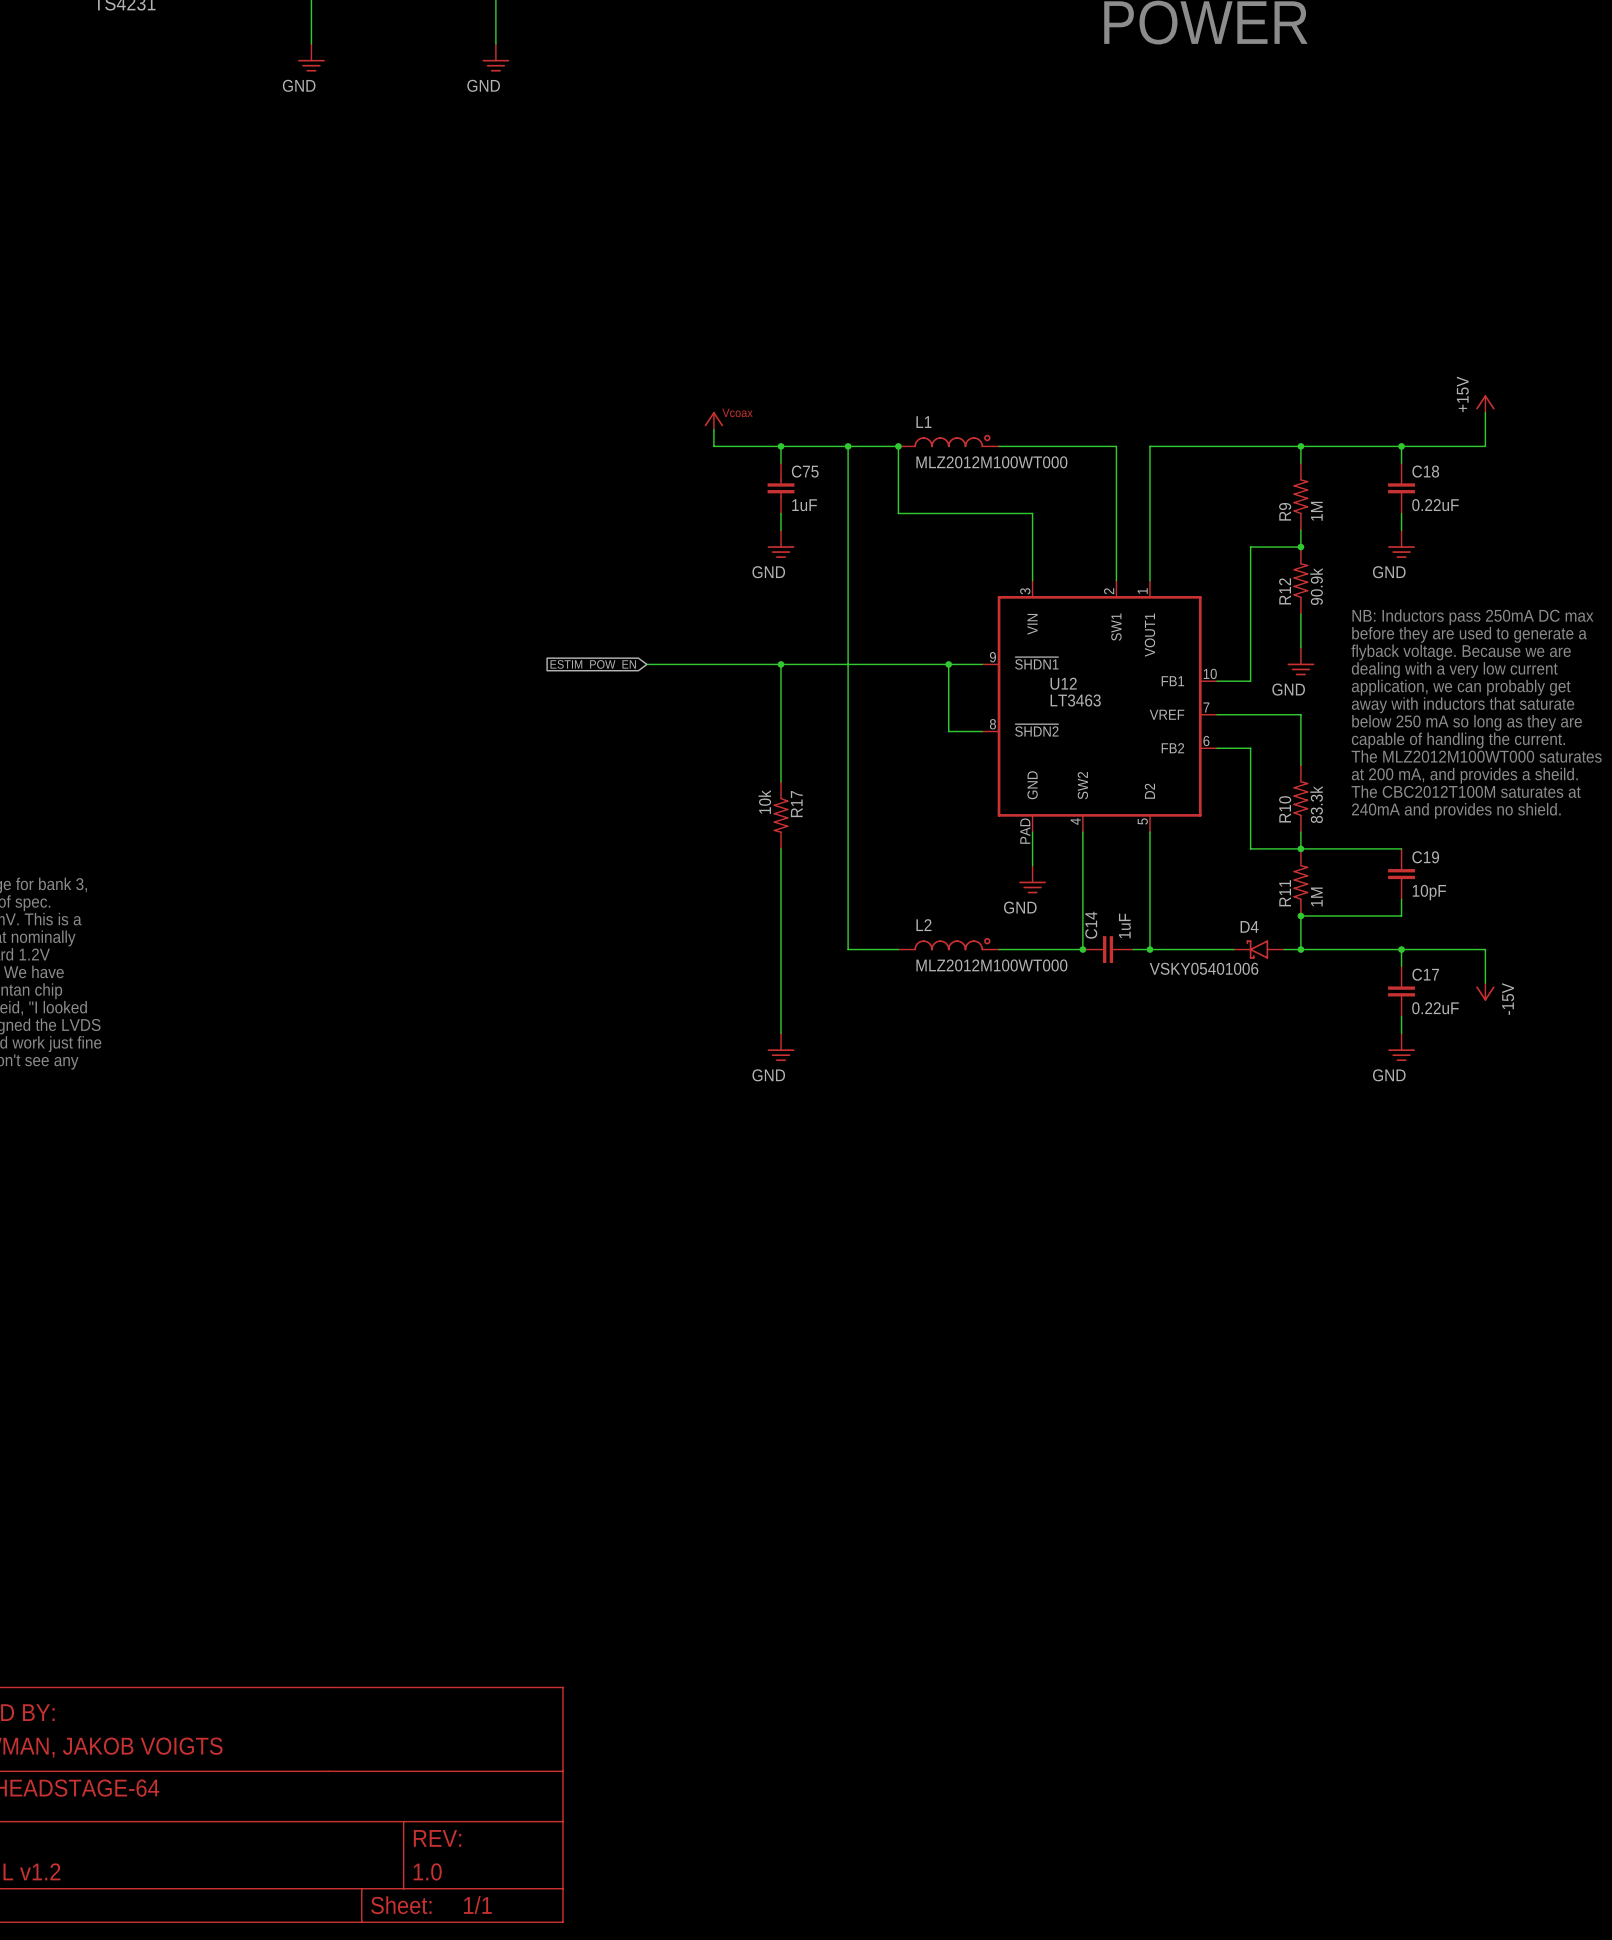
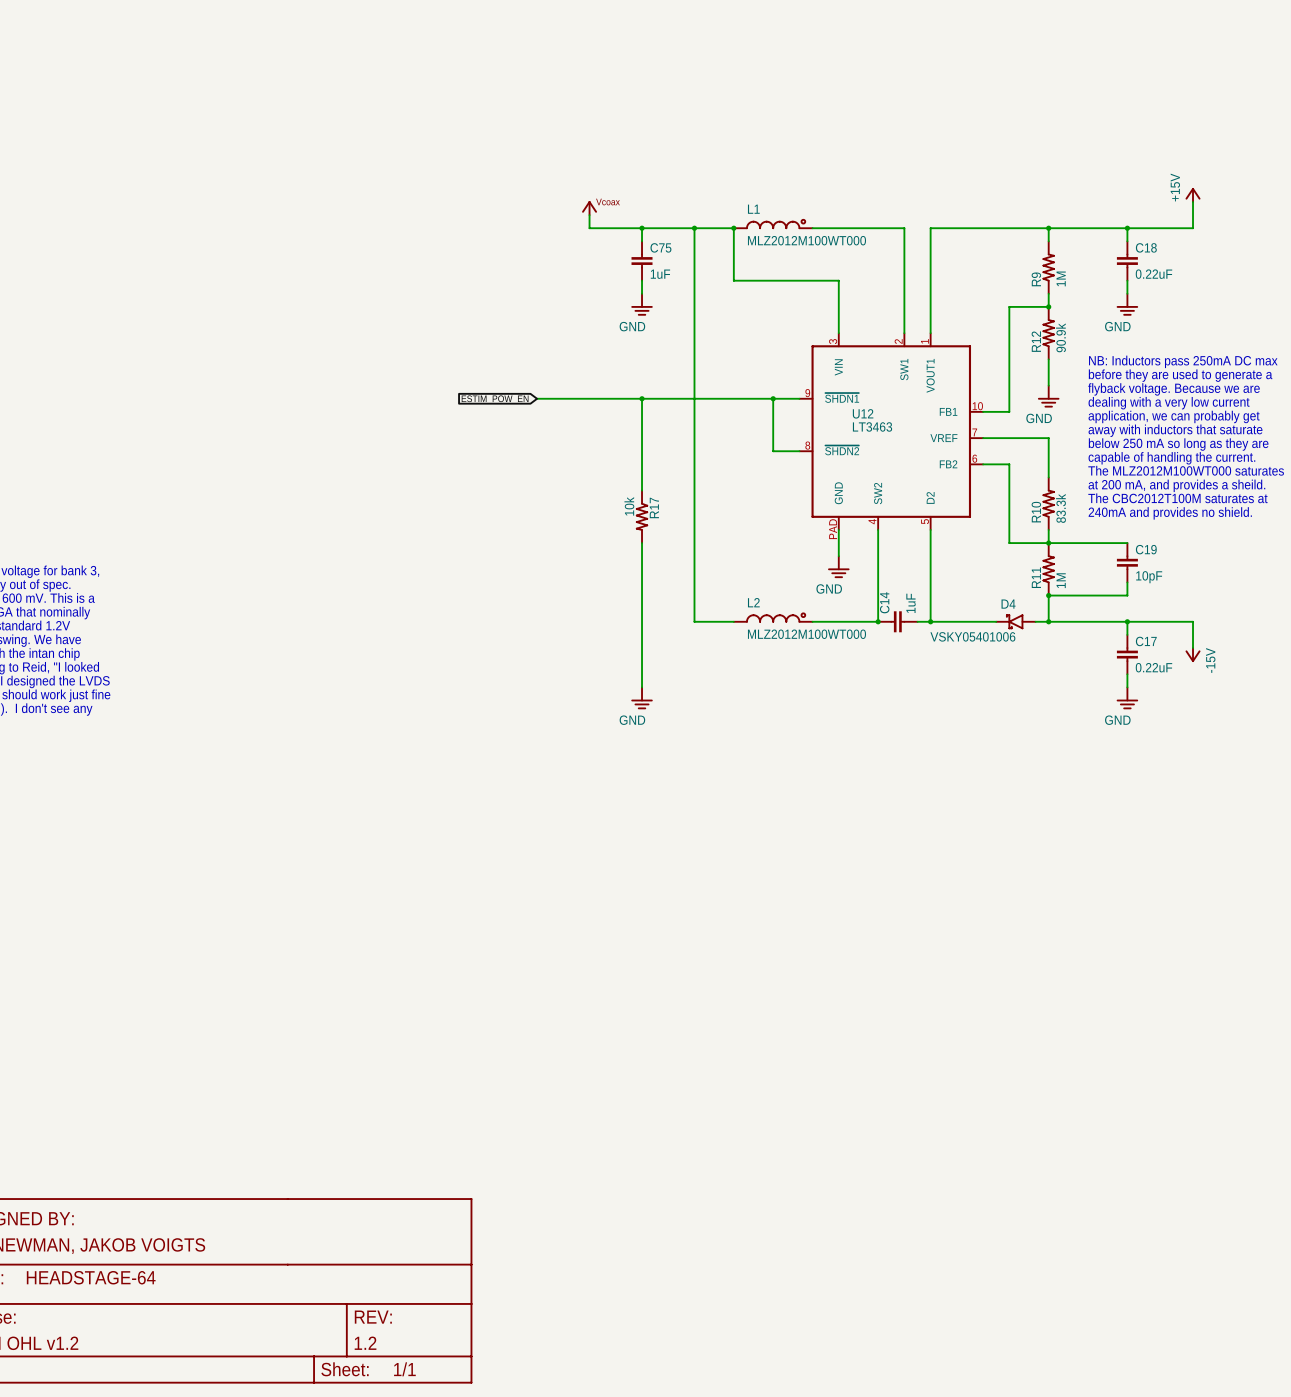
part text: 1.0 (427, 1871) -> 1.2 (365, 1343)

